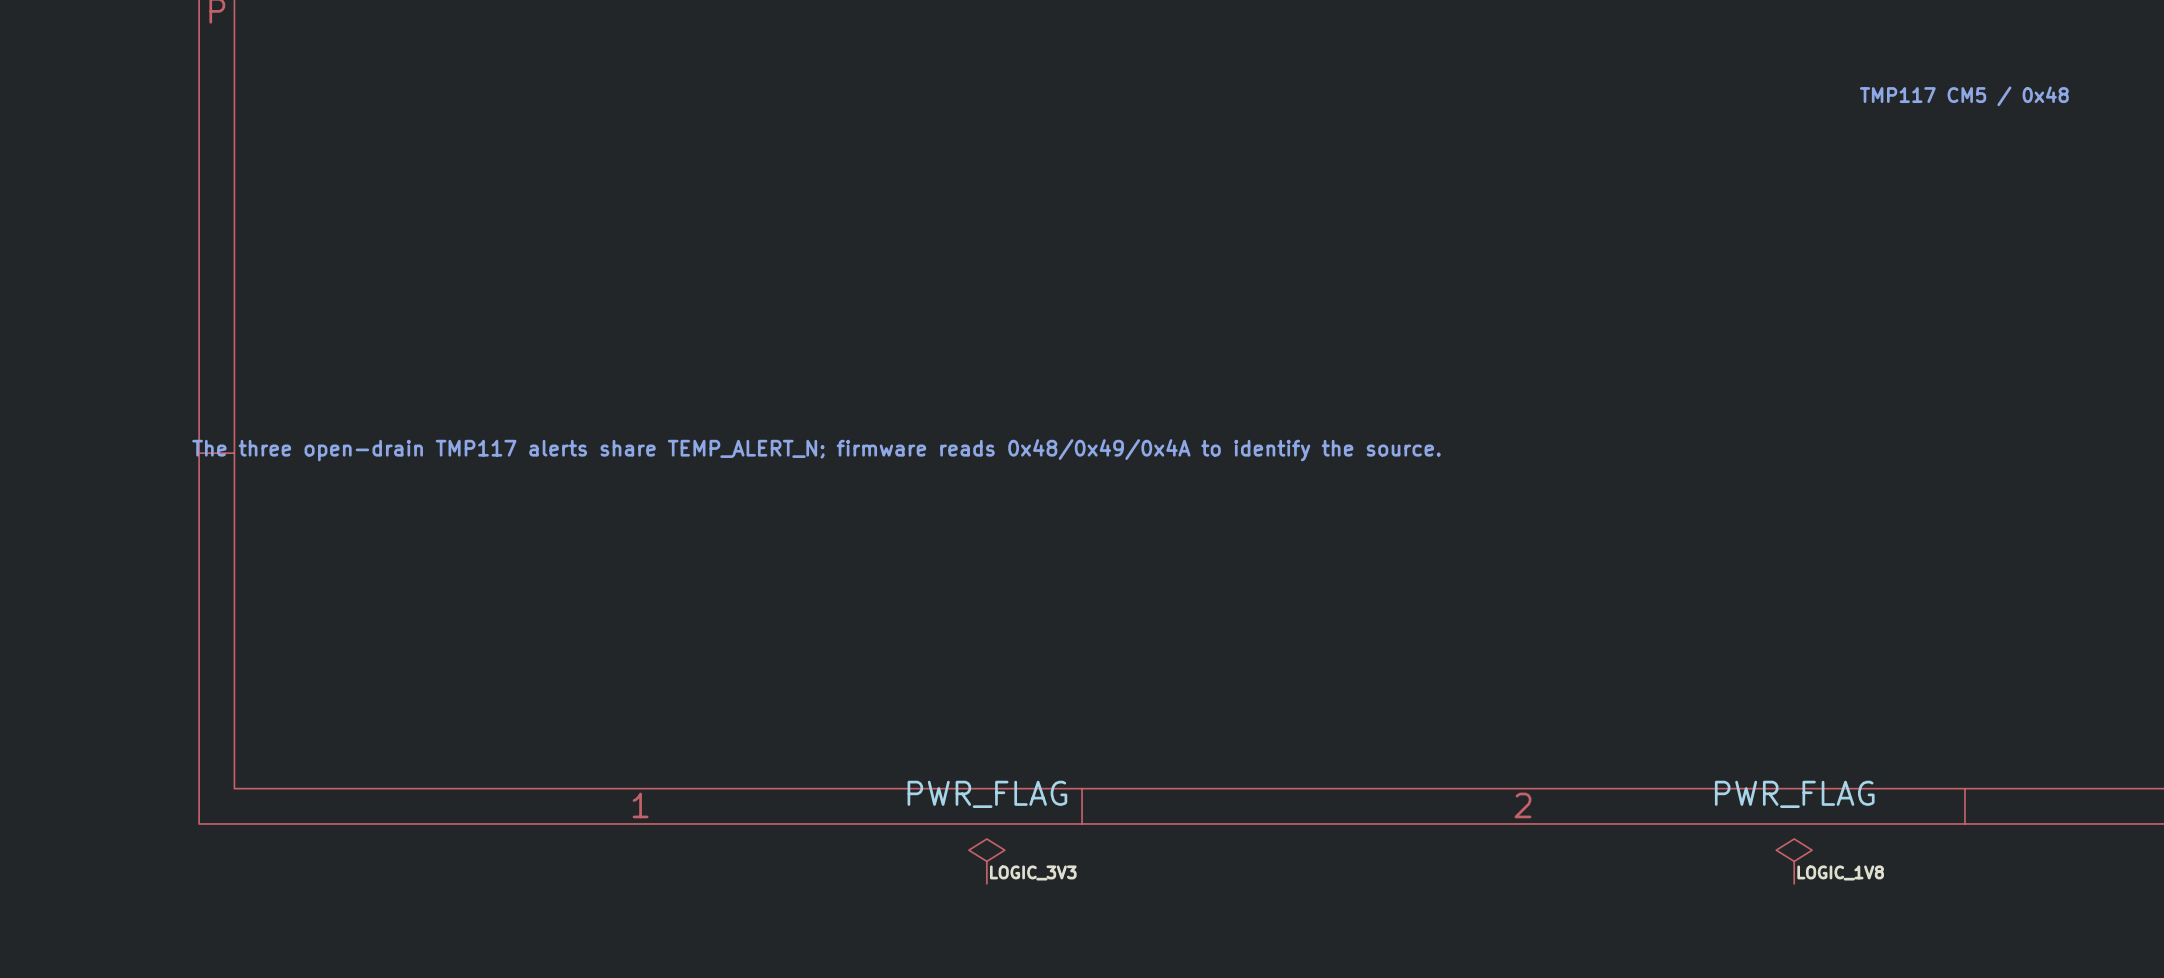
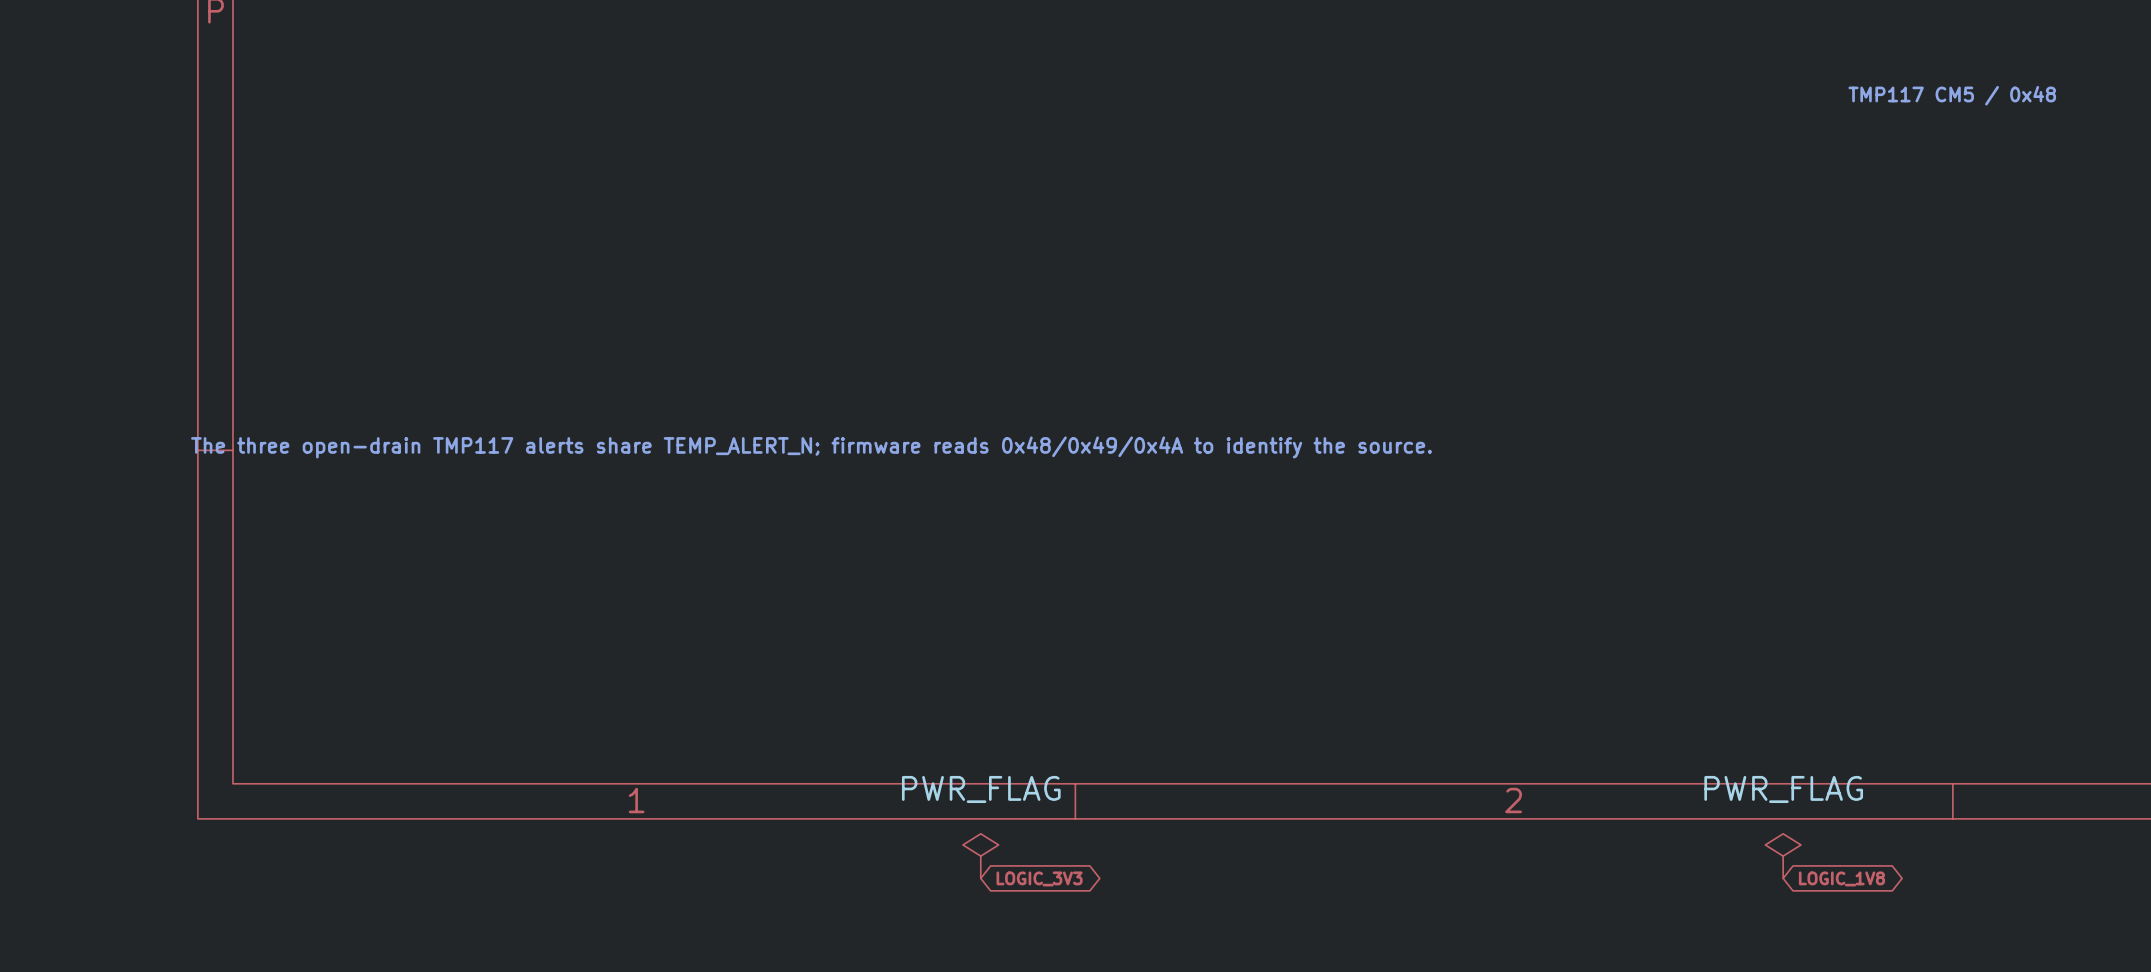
label: LOGIC_3V3 (1033, 872) -> none
label: LOGIC_1V8 (1840, 872) -> none
global label: none -> LOGIC_3V3 (1039, 878)
global label: none -> LOGIC_1V8 (1841, 878)

